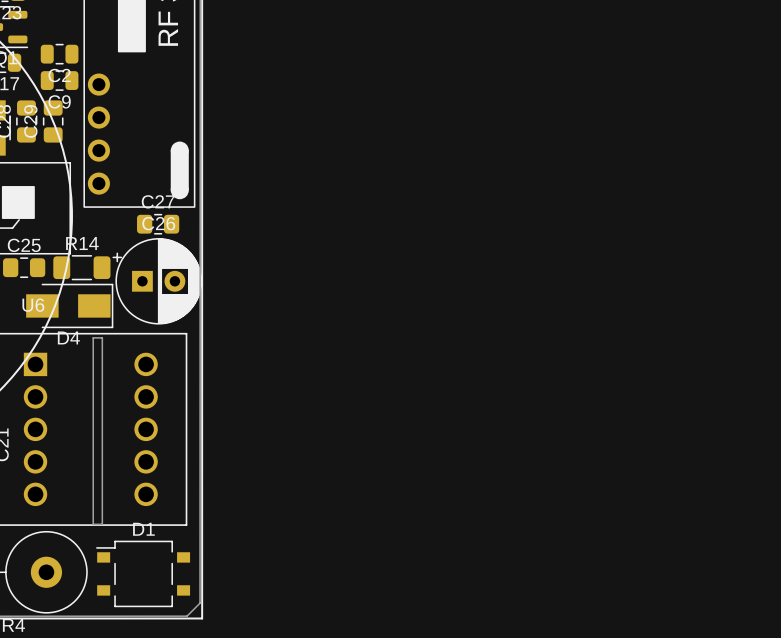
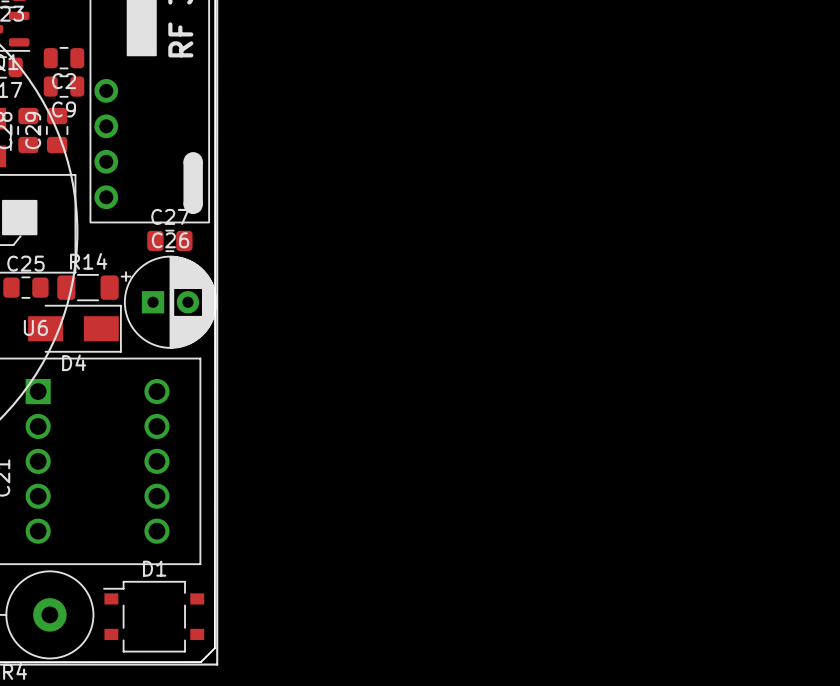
board edge: (93, 337) (102, 337) (102, 524) (93, 524) (93, 337) -> none

